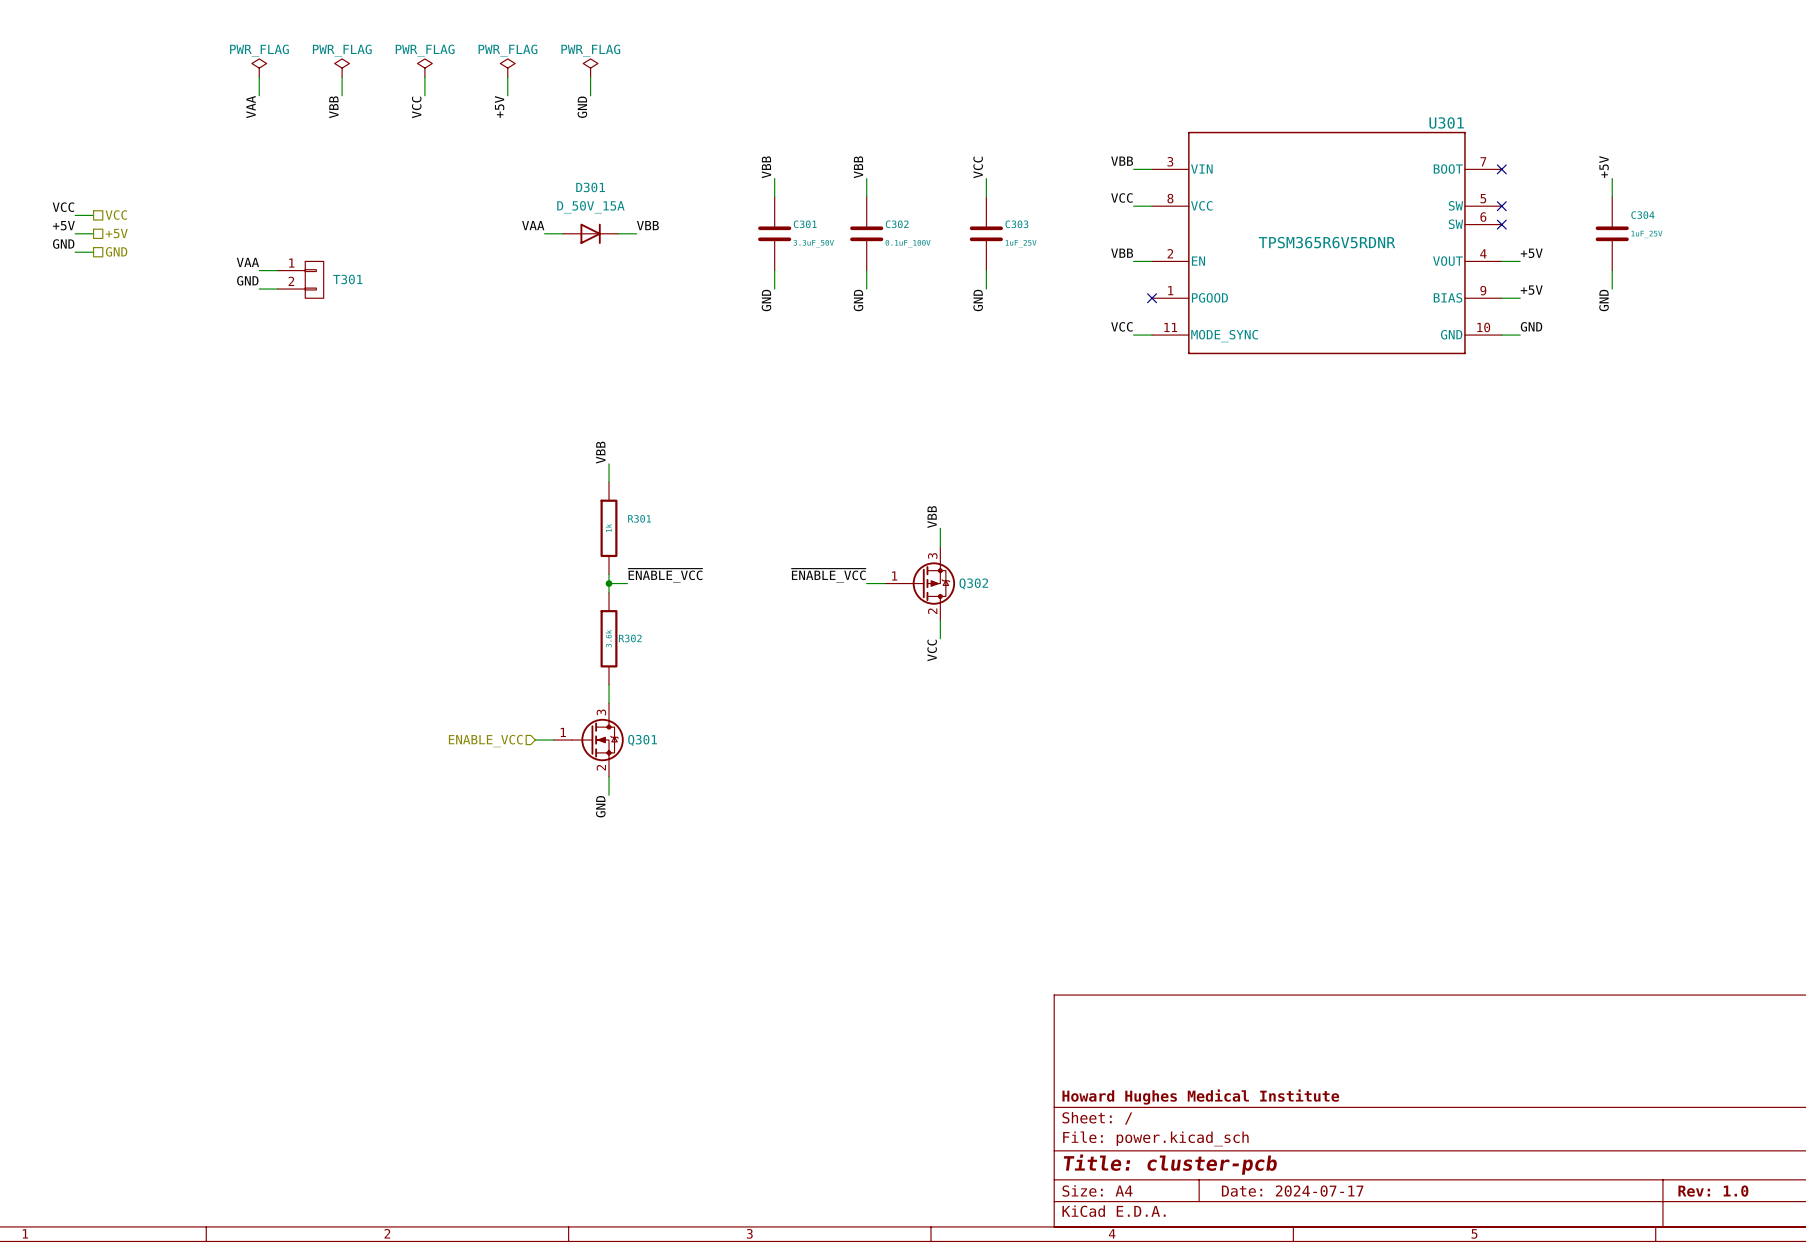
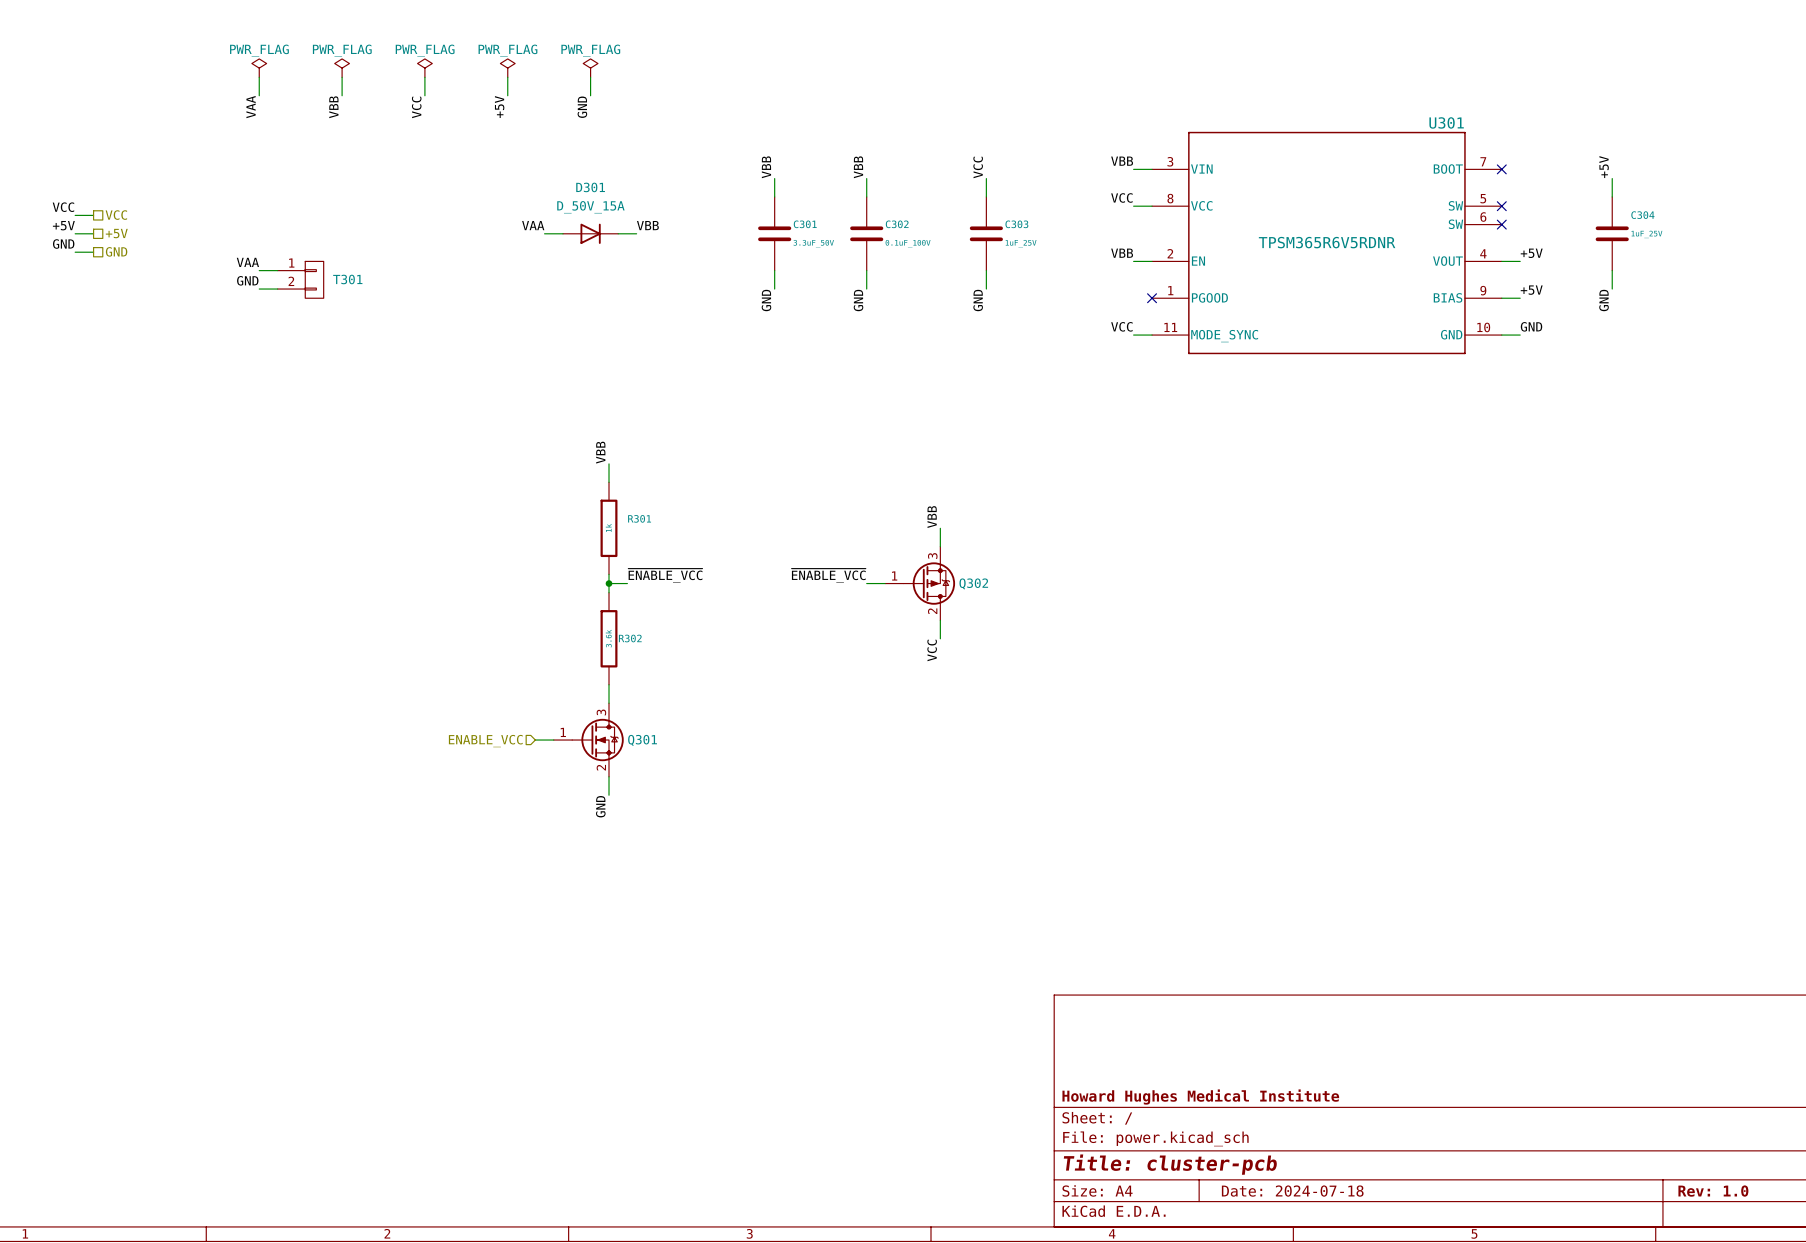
title block: Date: 2024-07-17 (1292, 1191) -> Date: 2024-07-18 (1292, 1191)

